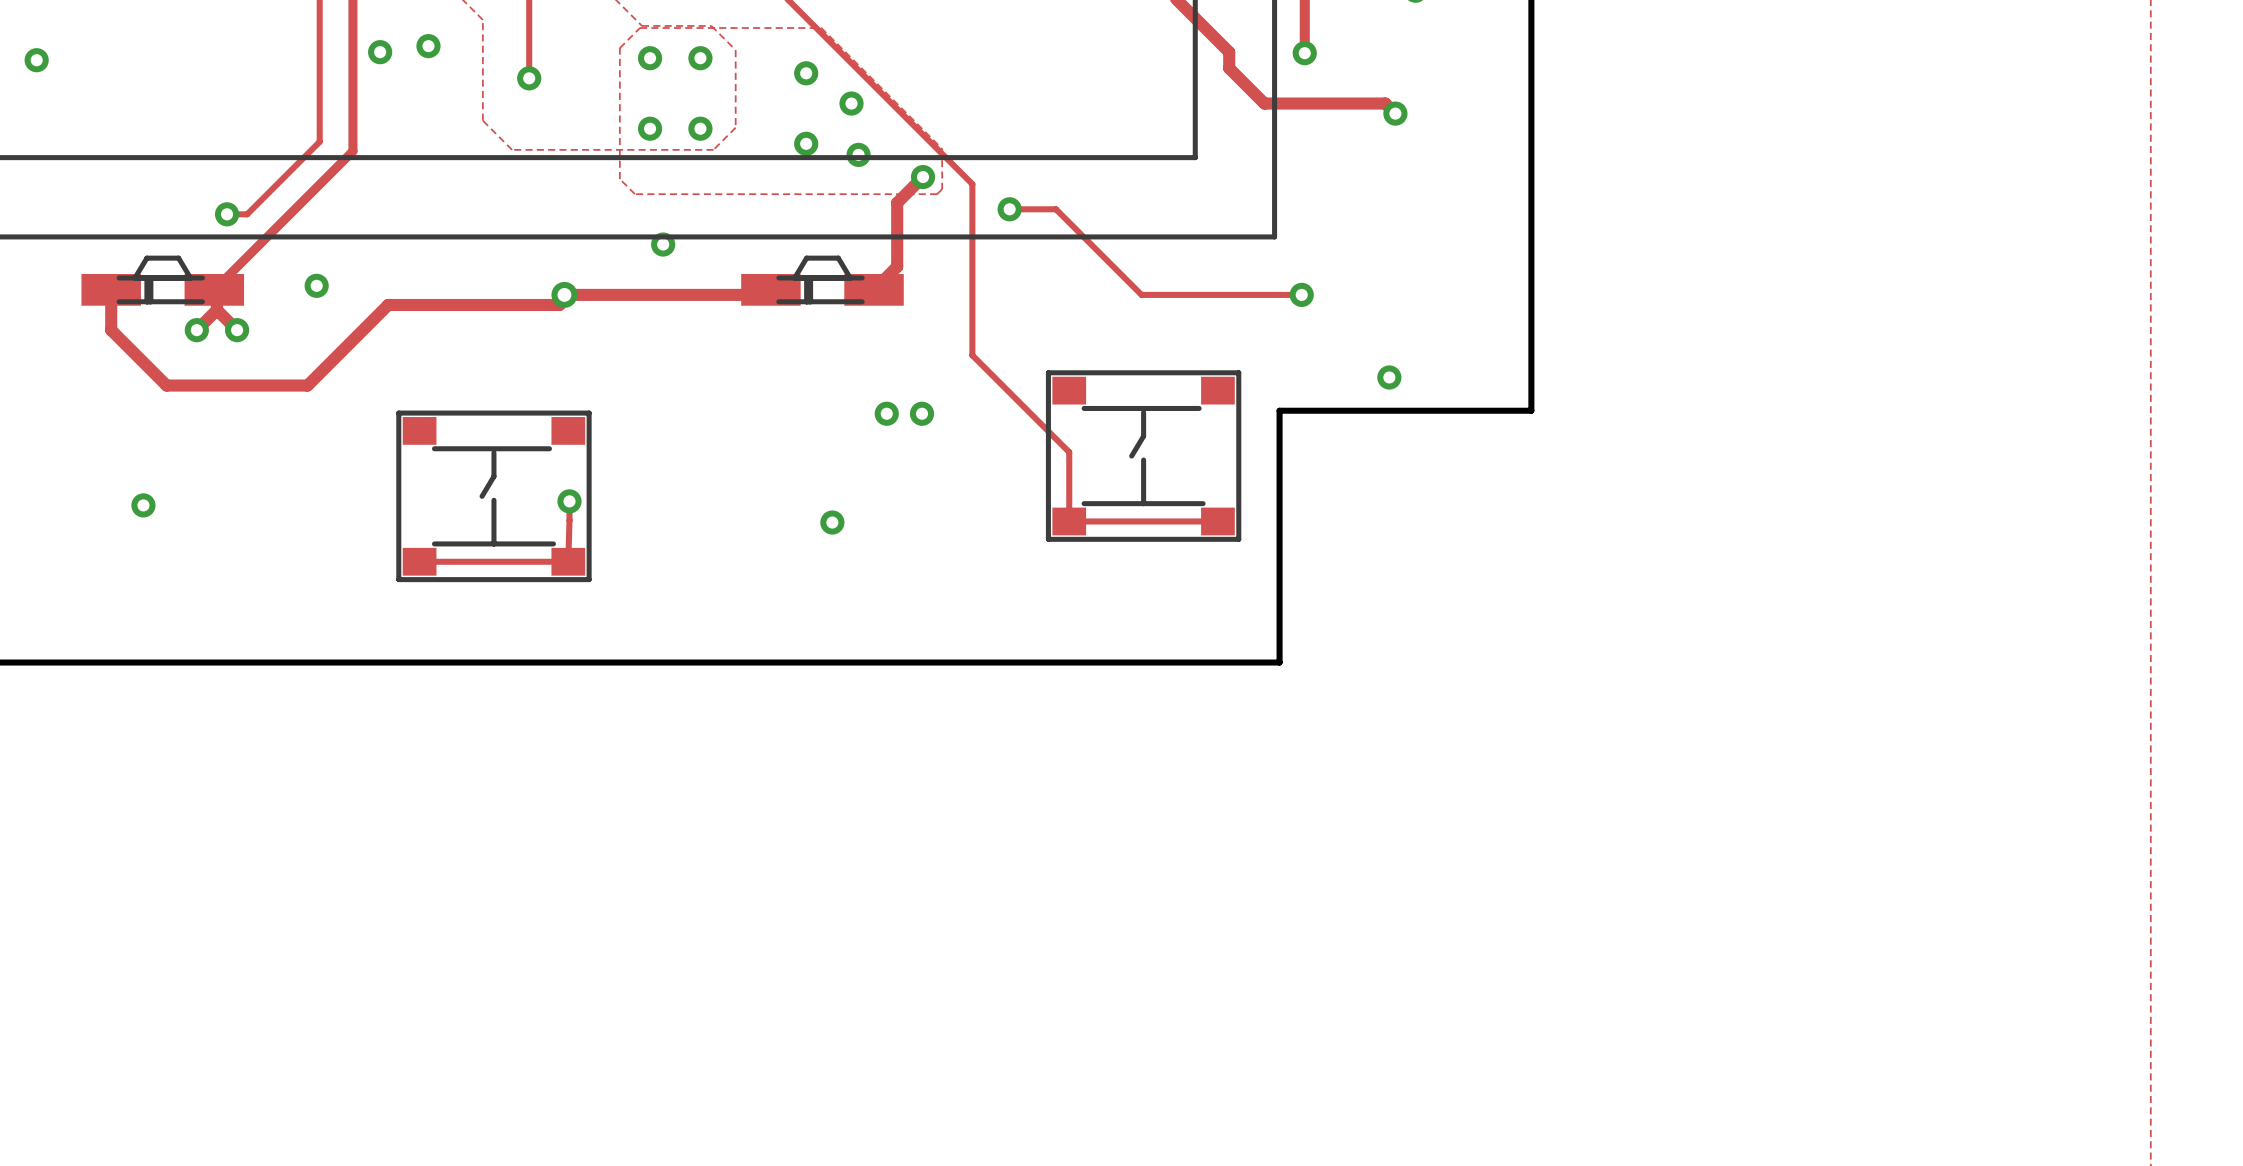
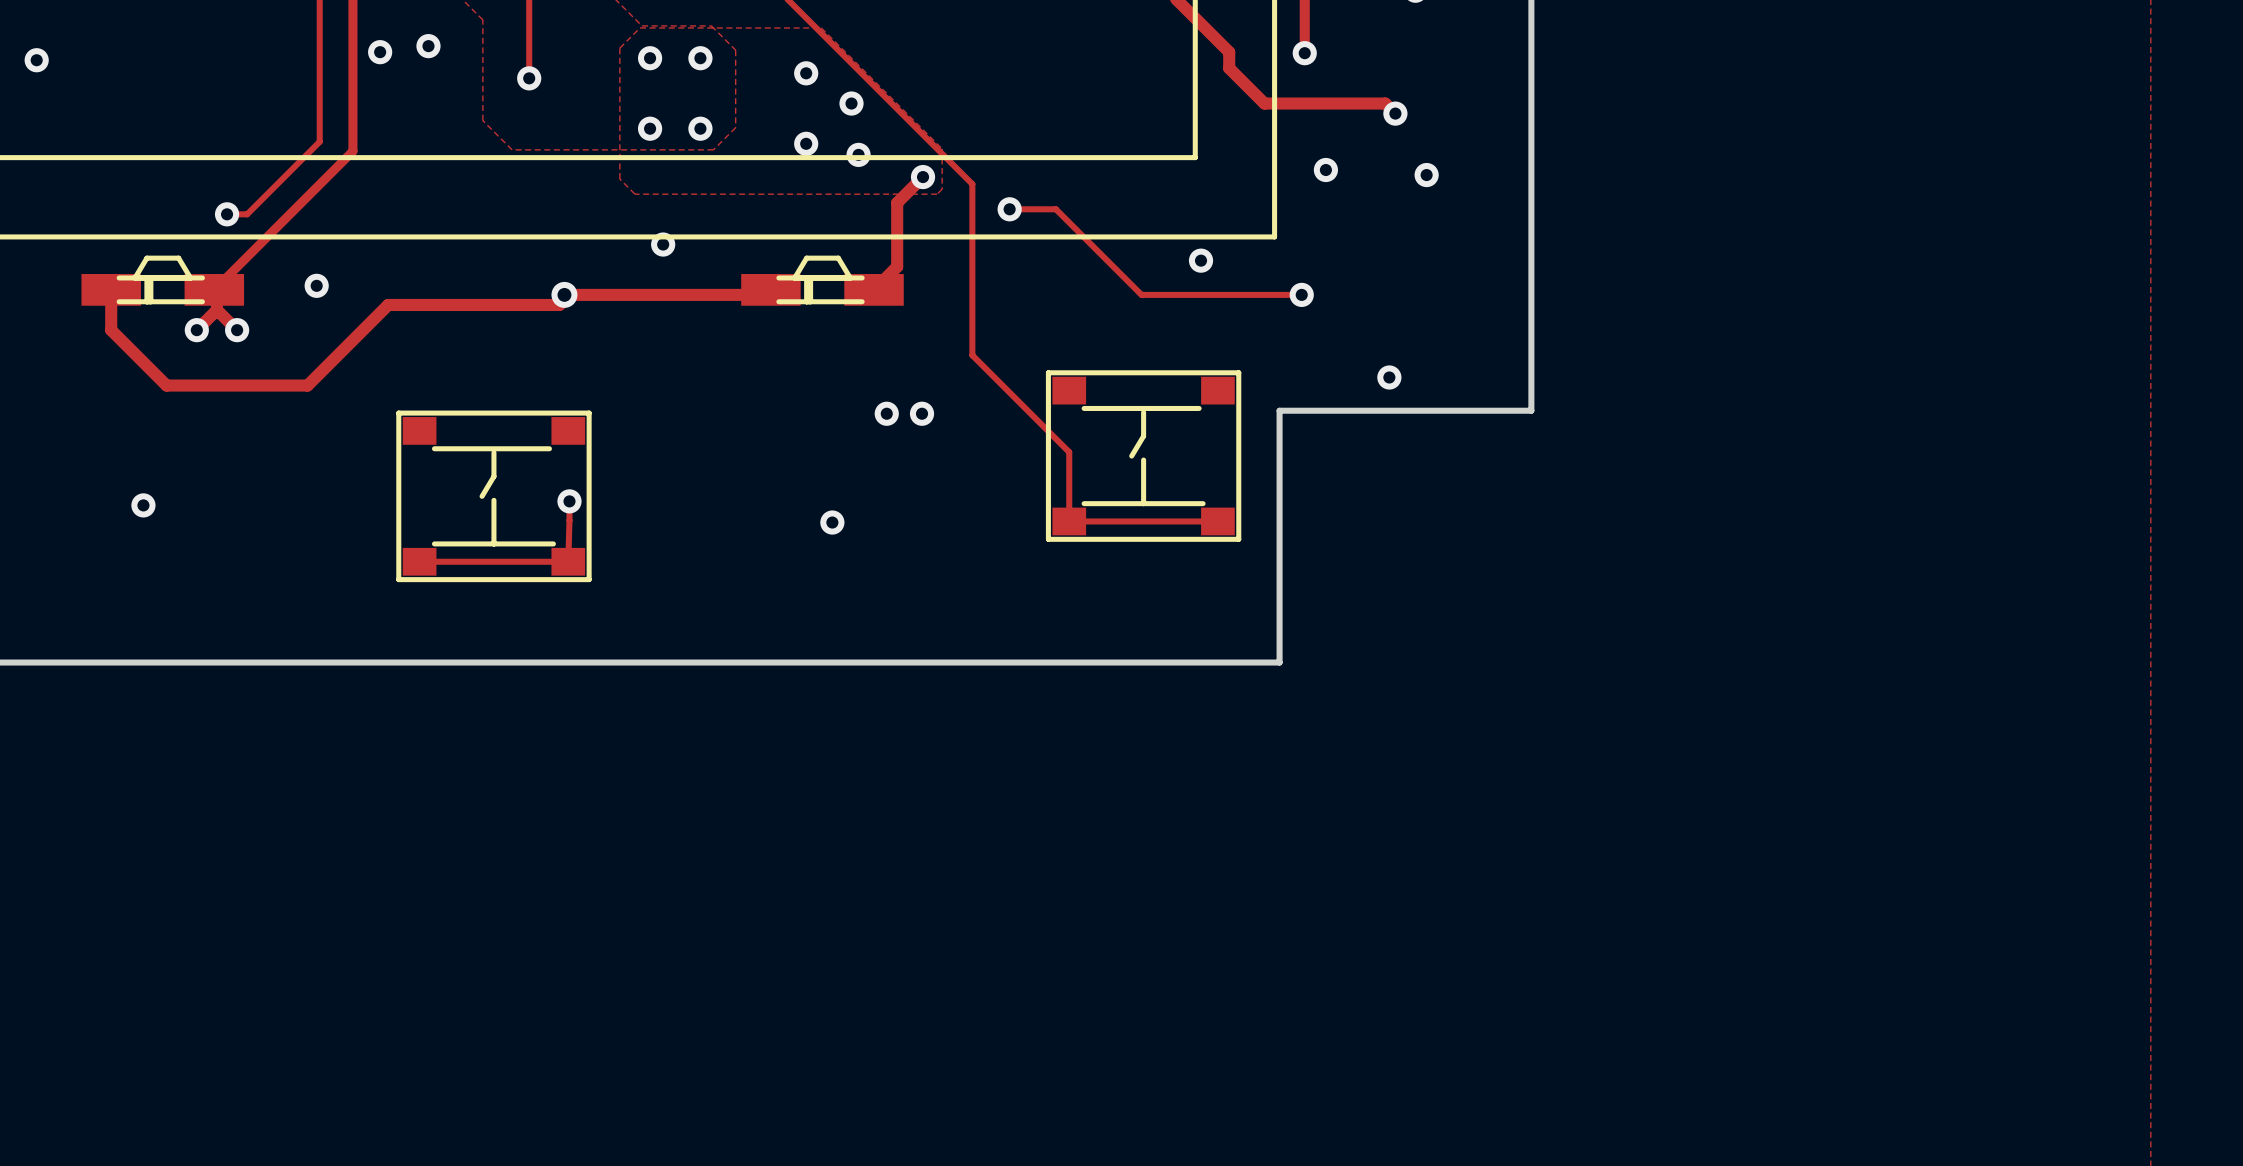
via: none -> (1325, 170)
via: none -> (1426, 175)
via: none -> (1201, 260)

